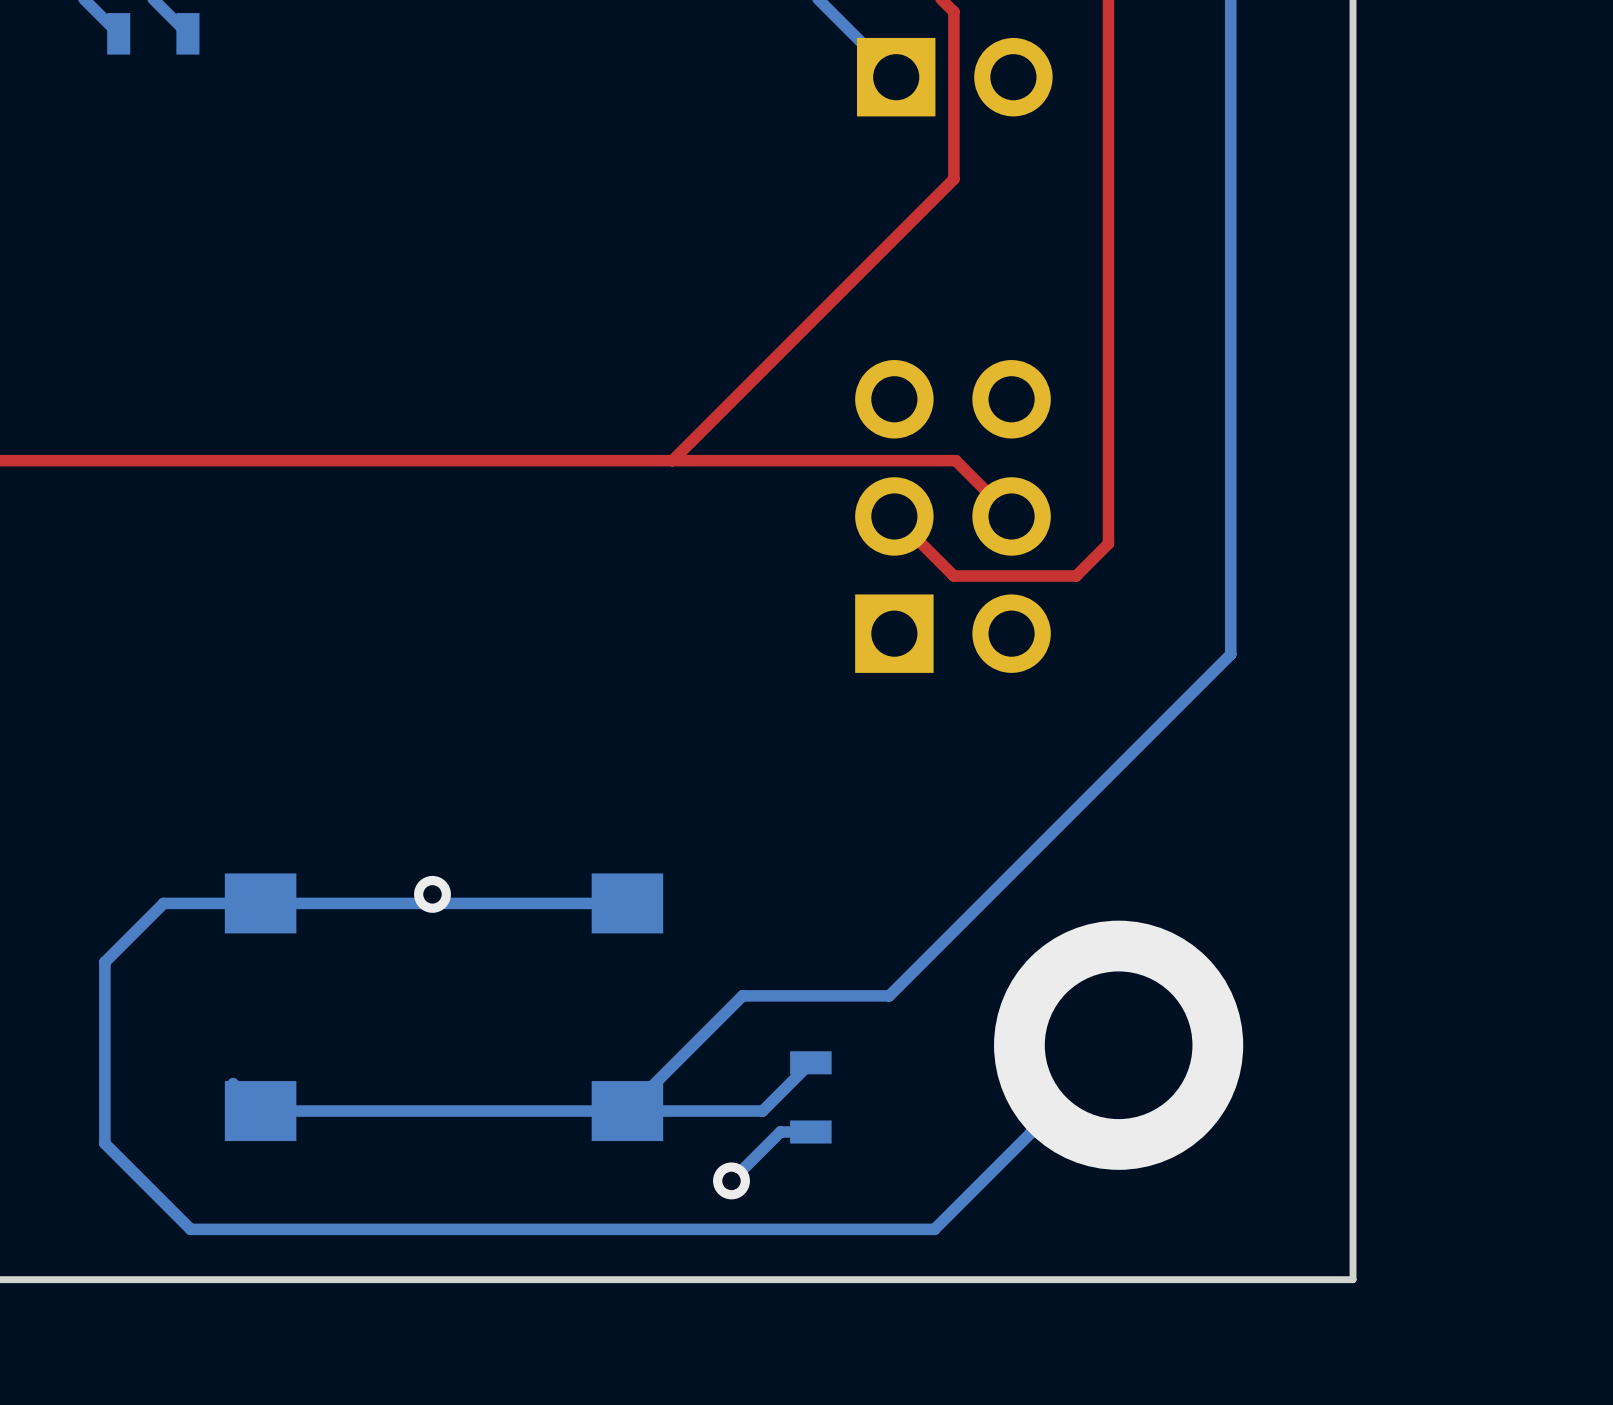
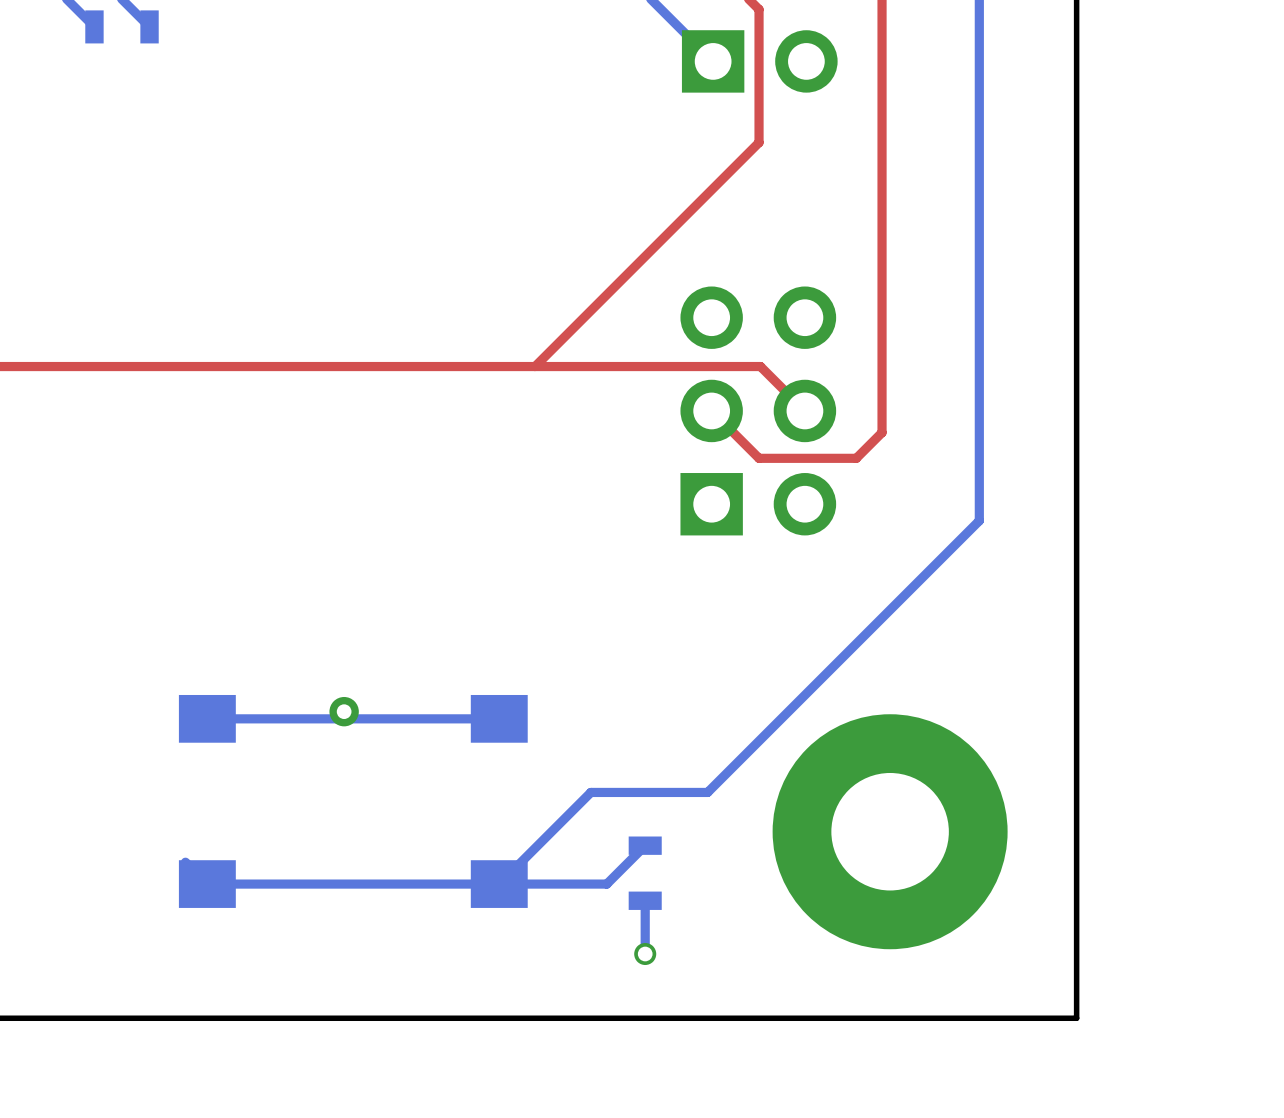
bottom track: (260, 903) (163, 903) (104, 962) (104, 1143) (190, 1229) (934, 1229) (1118, 1045) -> none
via size: [994, 920, 1244, 1170] -> [772, 714, 1008, 950]
bottom track: (810, 1132) (780, 1132) (731, 1180) -> (645, 900) (645, 953)
via: (731, 1180) -> none
via: none -> (645, 953)

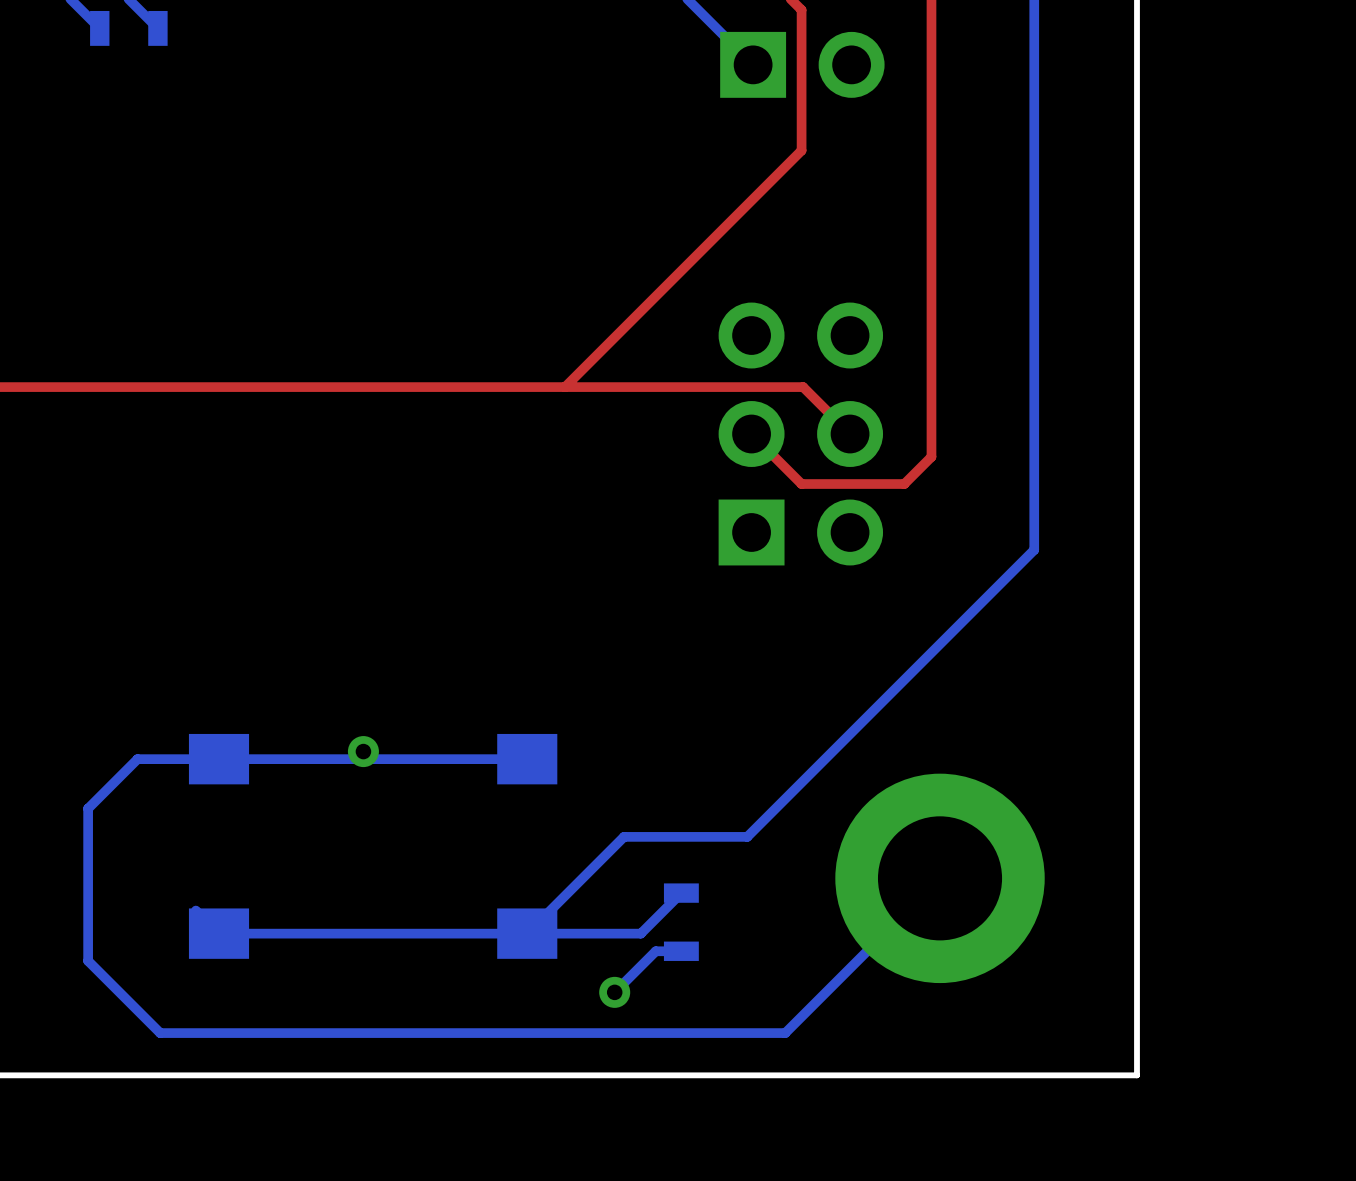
via size: [772, 714, 1008, 950] -> [835, 773, 1045, 984]
bottom track: none -> (218, 759) (137, 759) (88, 808) (88, 960) (160, 1033) (785, 1033) (940, 878)
bottom track: (645, 900) (645, 953) -> (681, 951) (655, 951) (614, 992)
via: none -> (614, 992)
via: (645, 953) -> none

